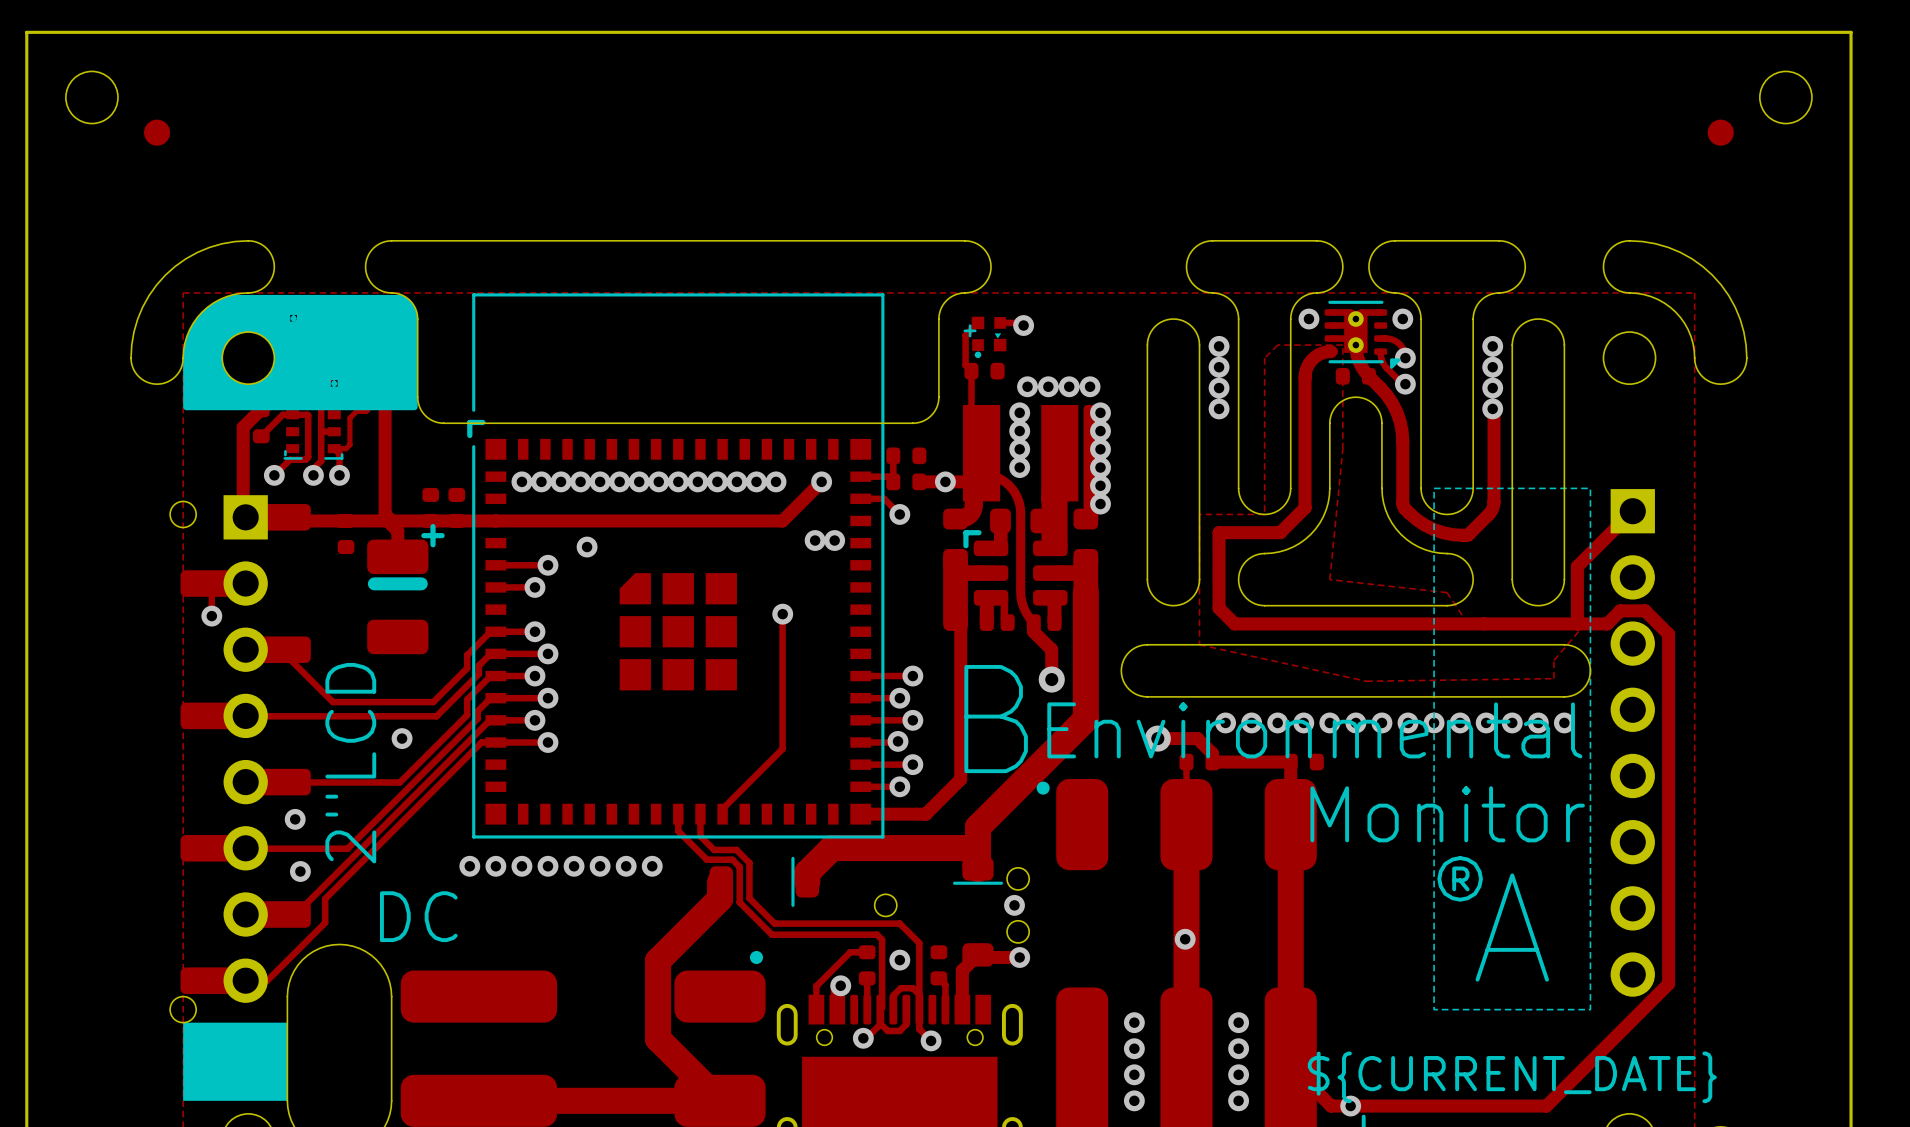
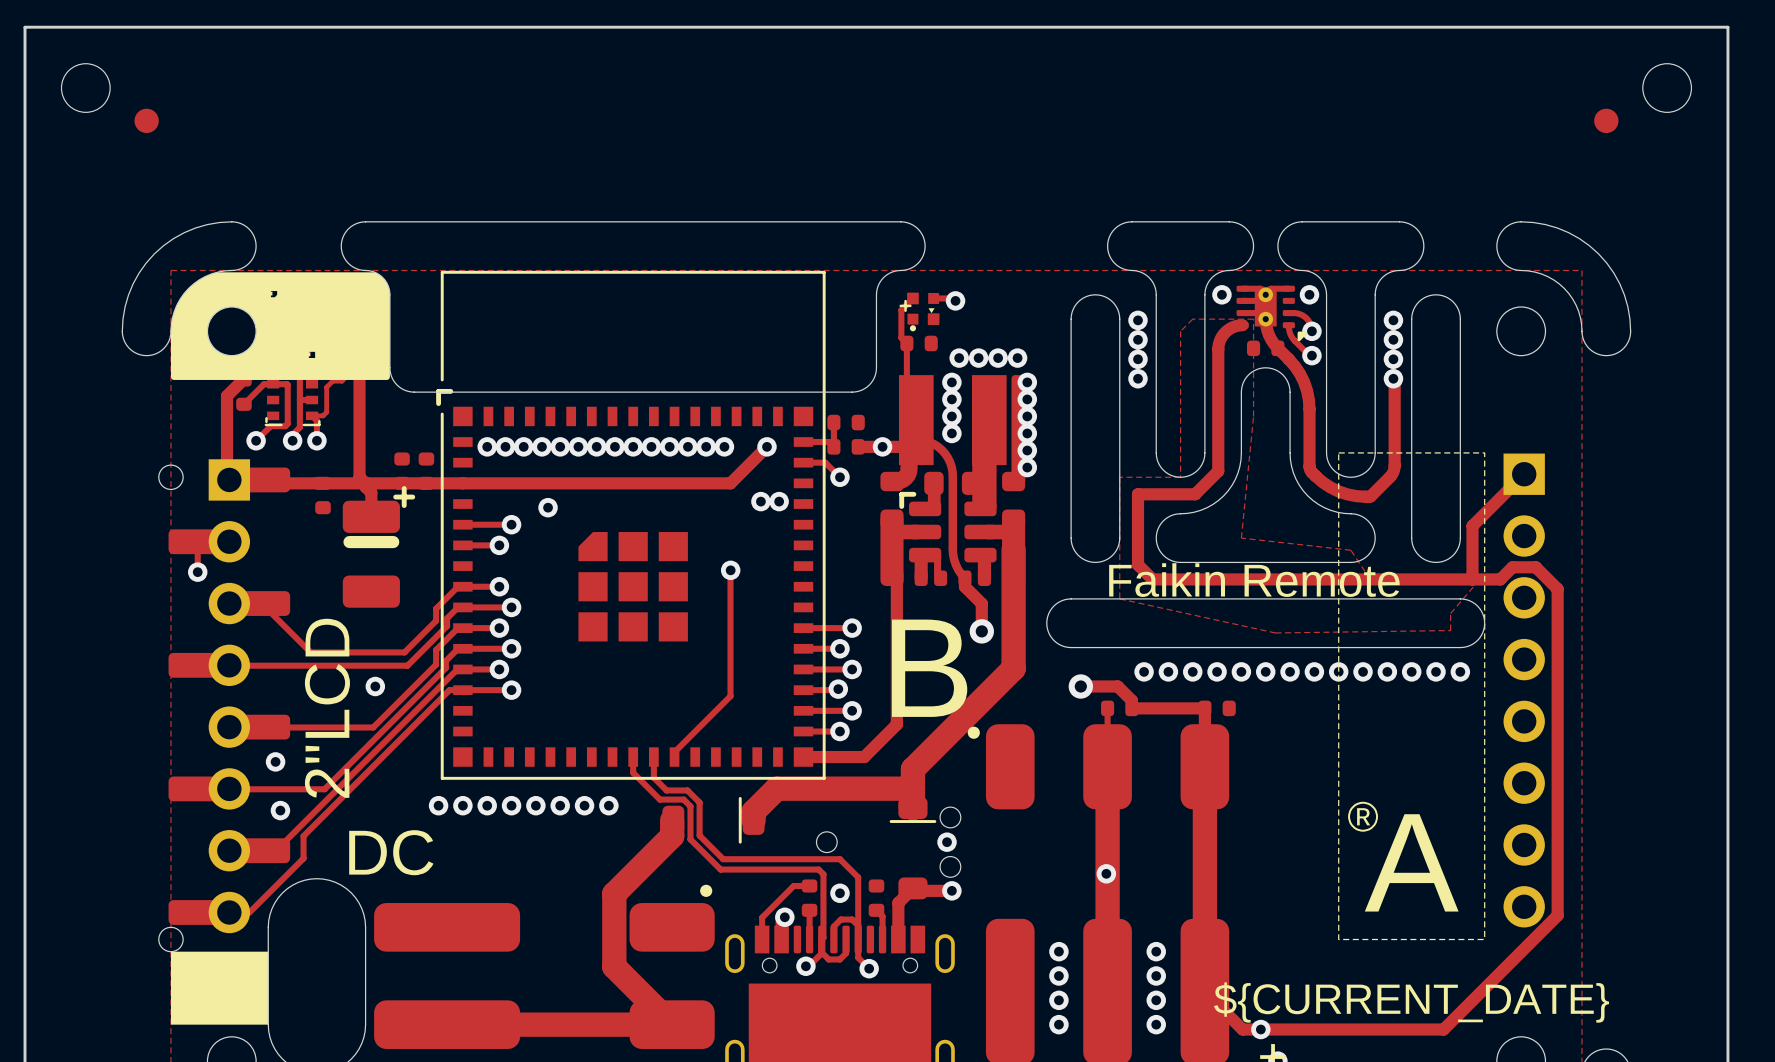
part footprint: [1324, 300, 1401, 369] -> [1236, 285, 1308, 342]
text: none -> Faikin Remote (1254, 580)
text: Environmental (1314, 730) -> none
text: Monitor (1447, 814) -> none

